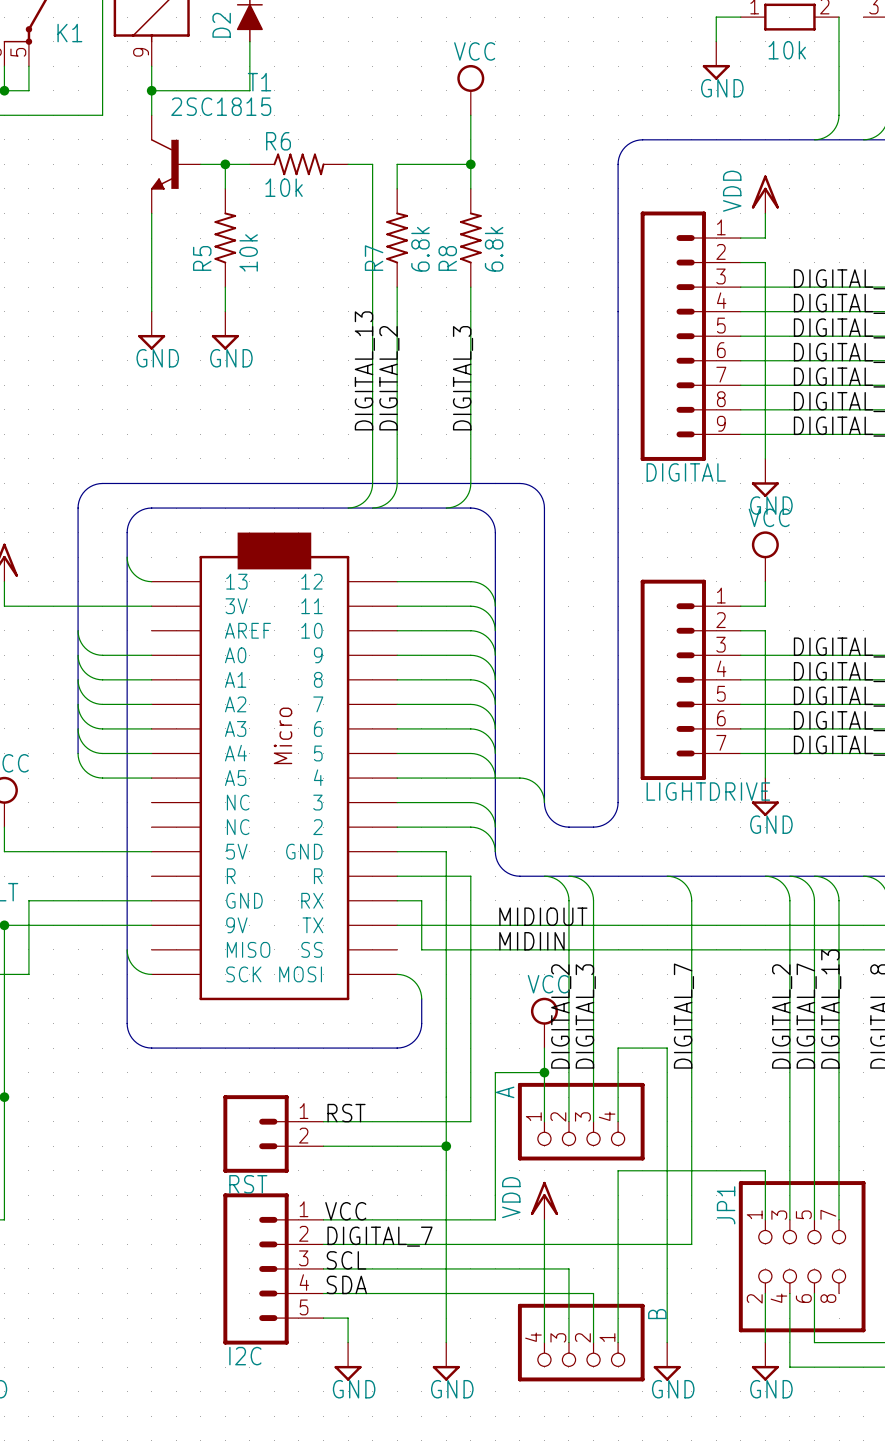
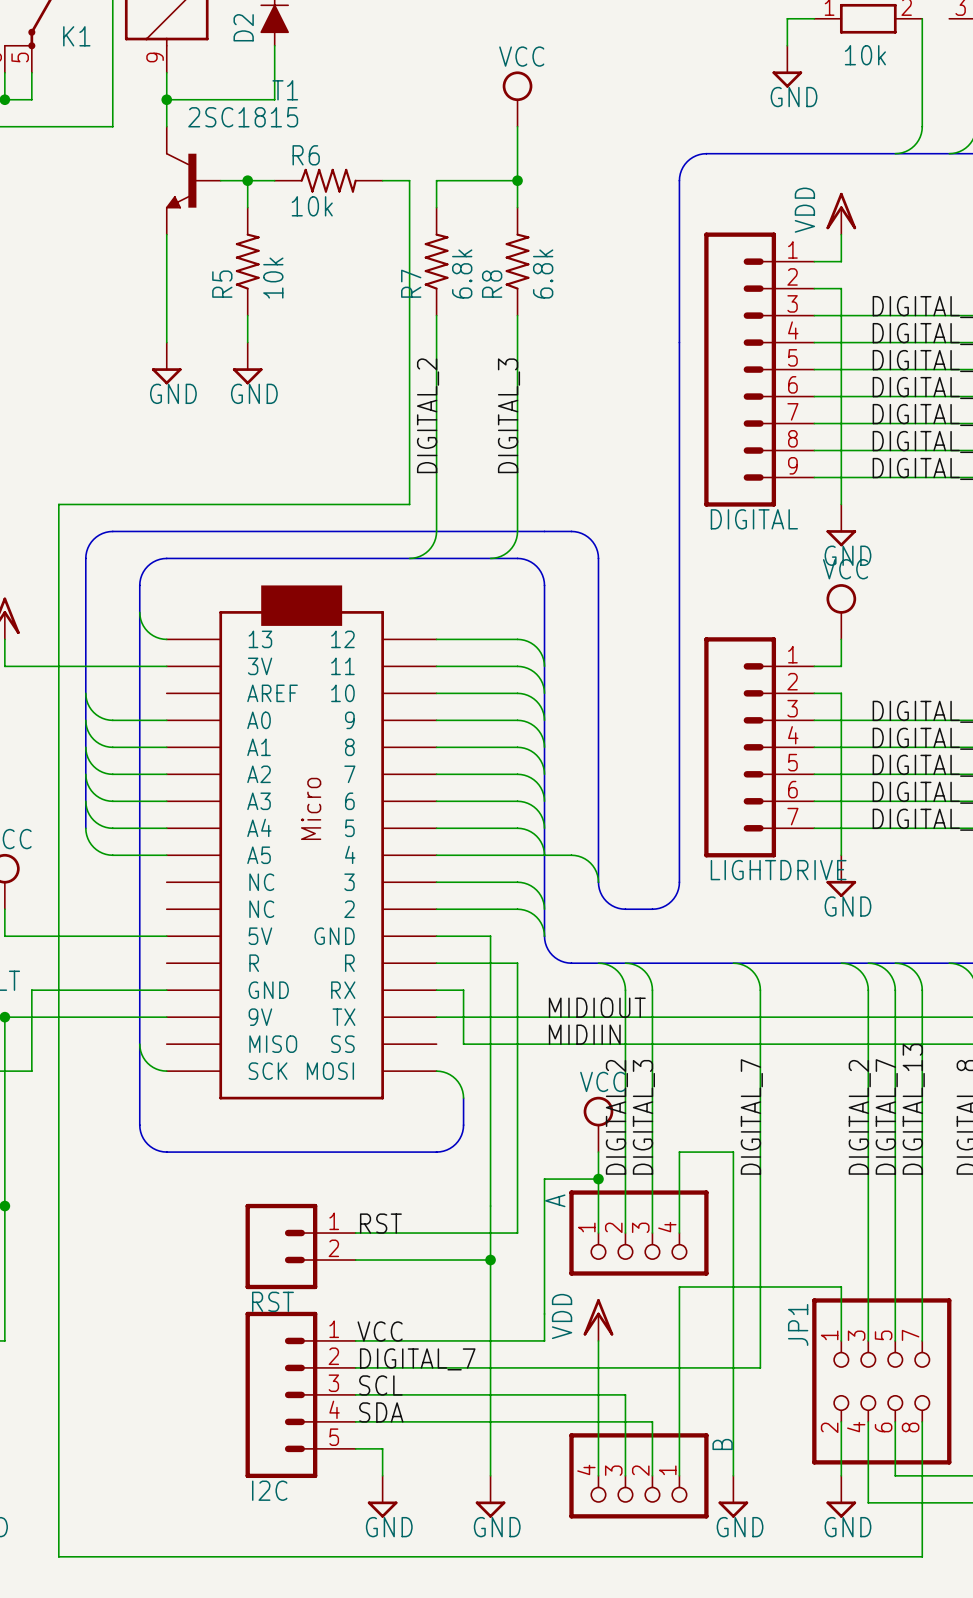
label: DIGITAL_13 (364, 370) -> none
wire: (372, 458) (372, 486) (369, 495) (360, 504) (348, 508) -> (409, 504) (58, 504) (58, 1556) (922, 1556) (922, 1421)

